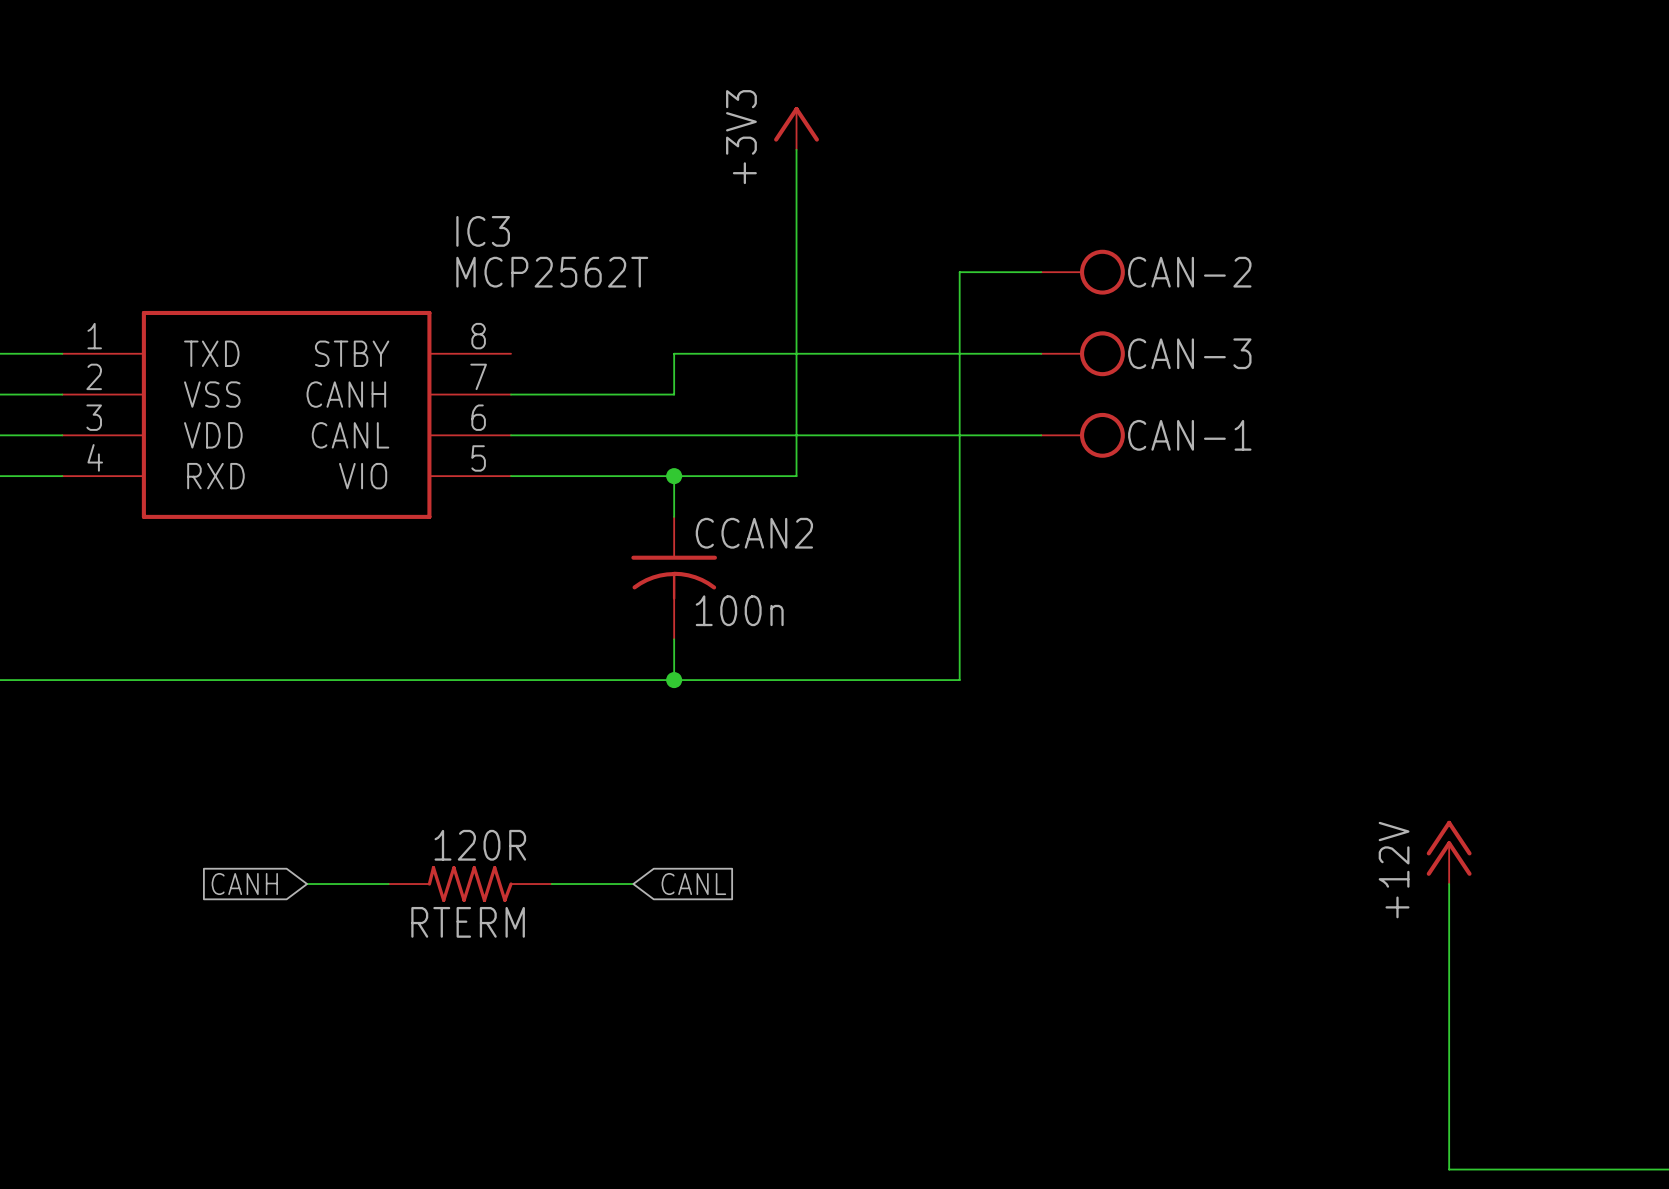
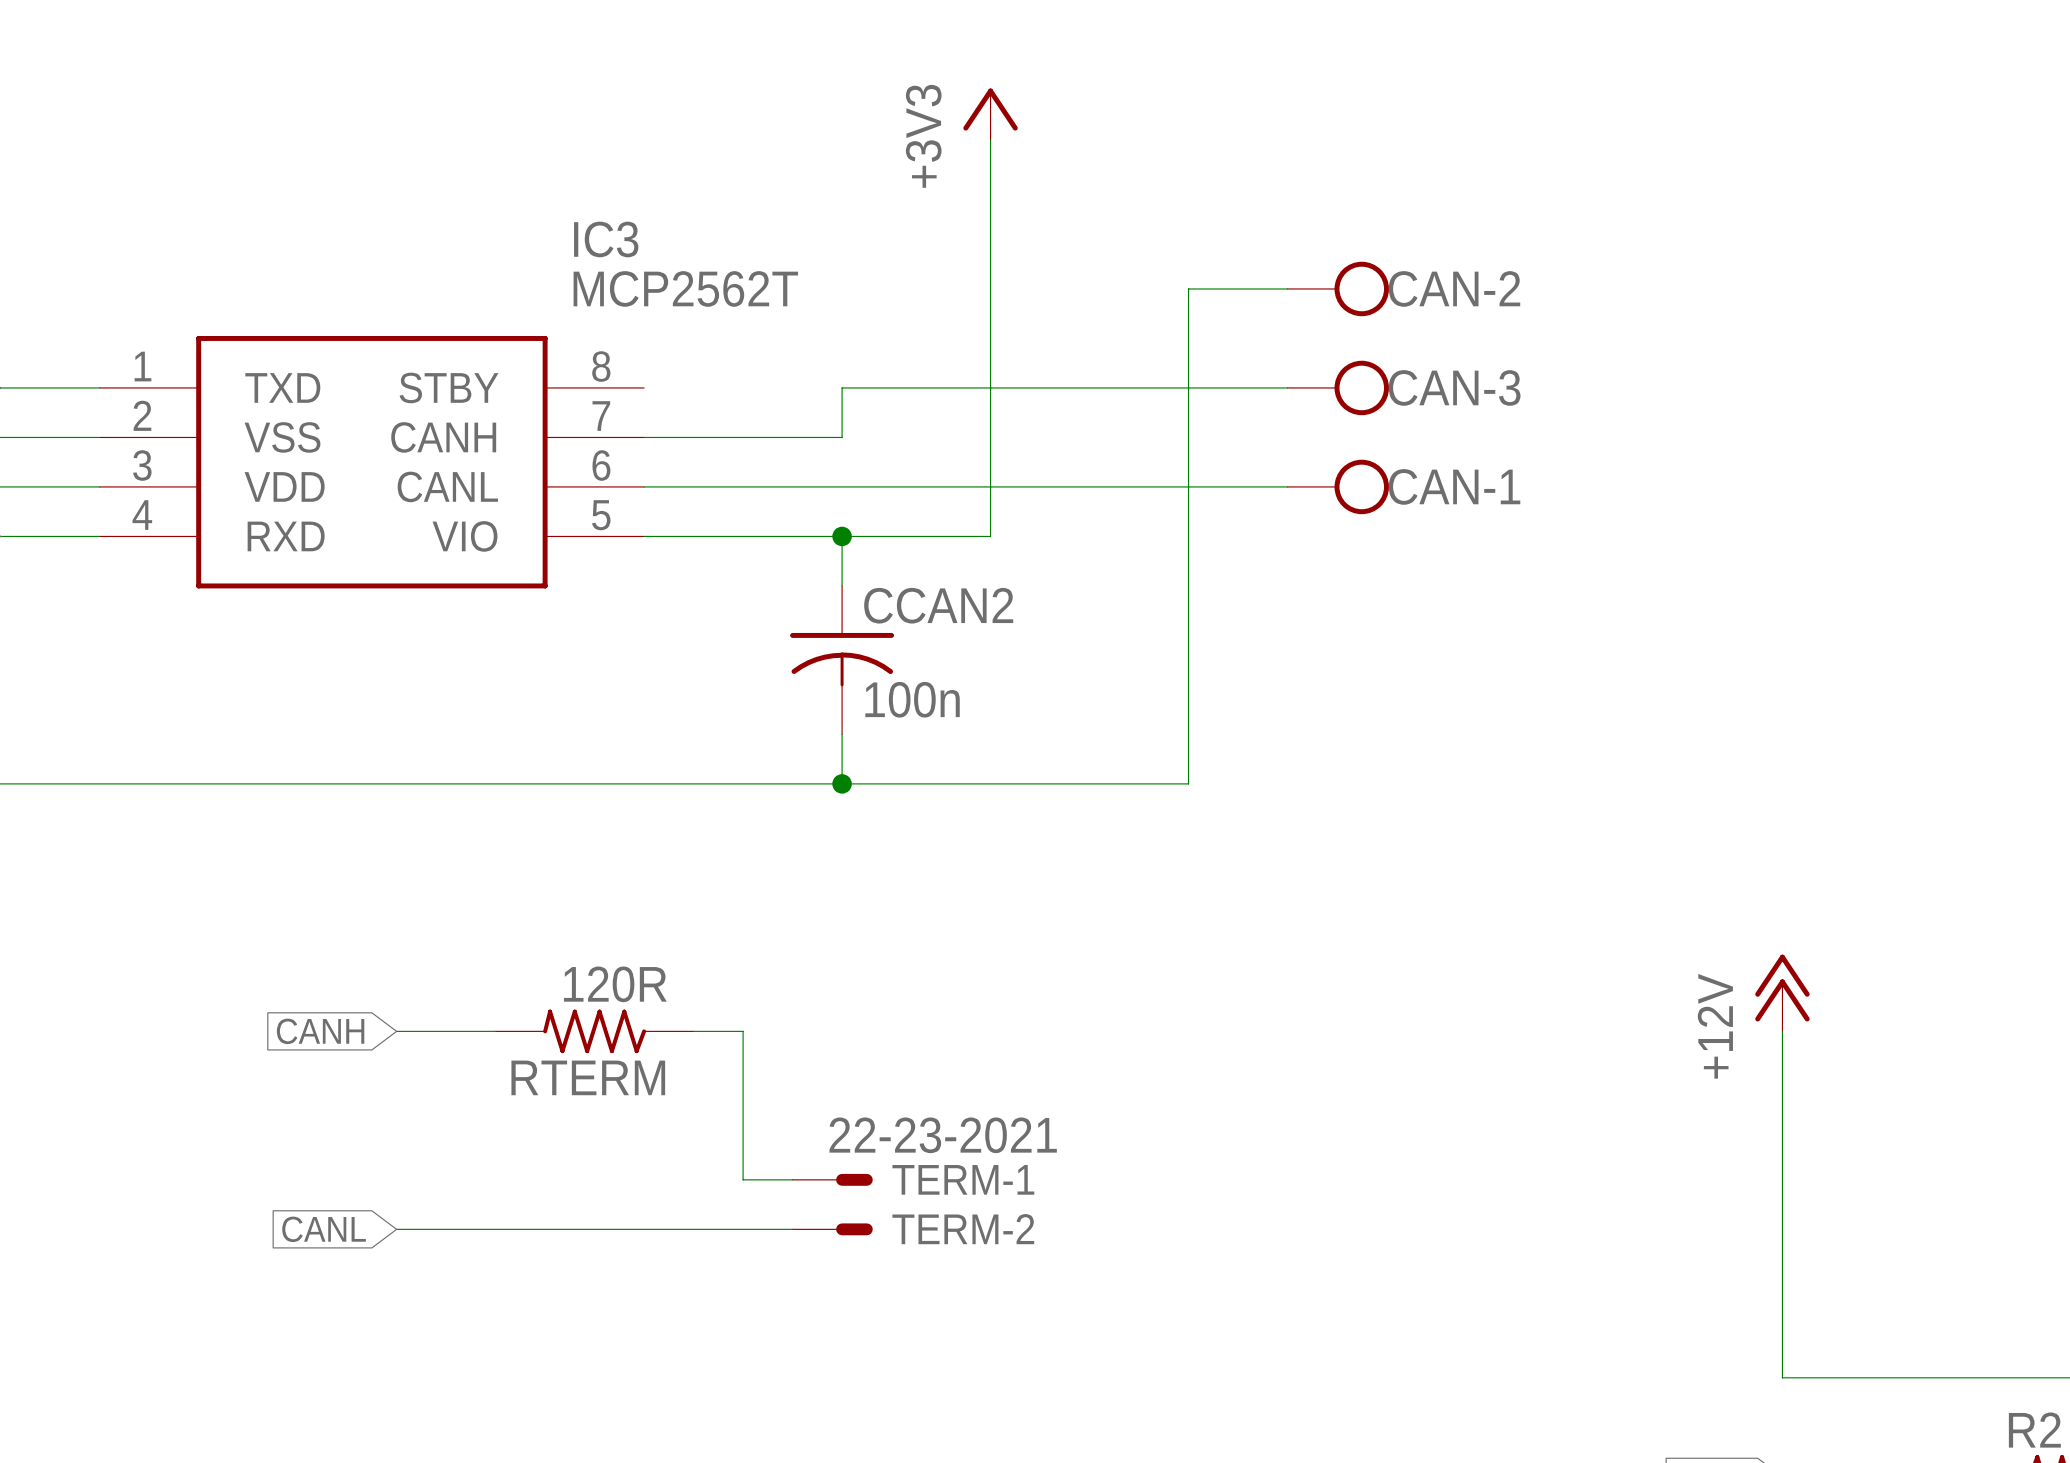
wire: (592, 884) (633, 884) -> (743, 1031) (743, 1179) (792, 1179)
global label rotation: 0° (693, 884) -> 180° (324, 1229)
global label position: CANL (693, 884) -> CANL (324, 1229)
TERM-1: none -> 22-23-2021 (832, 1179)
wire: none -> (396, 1229) (792, 1229)
TERM-2: none -> (832, 1229)

